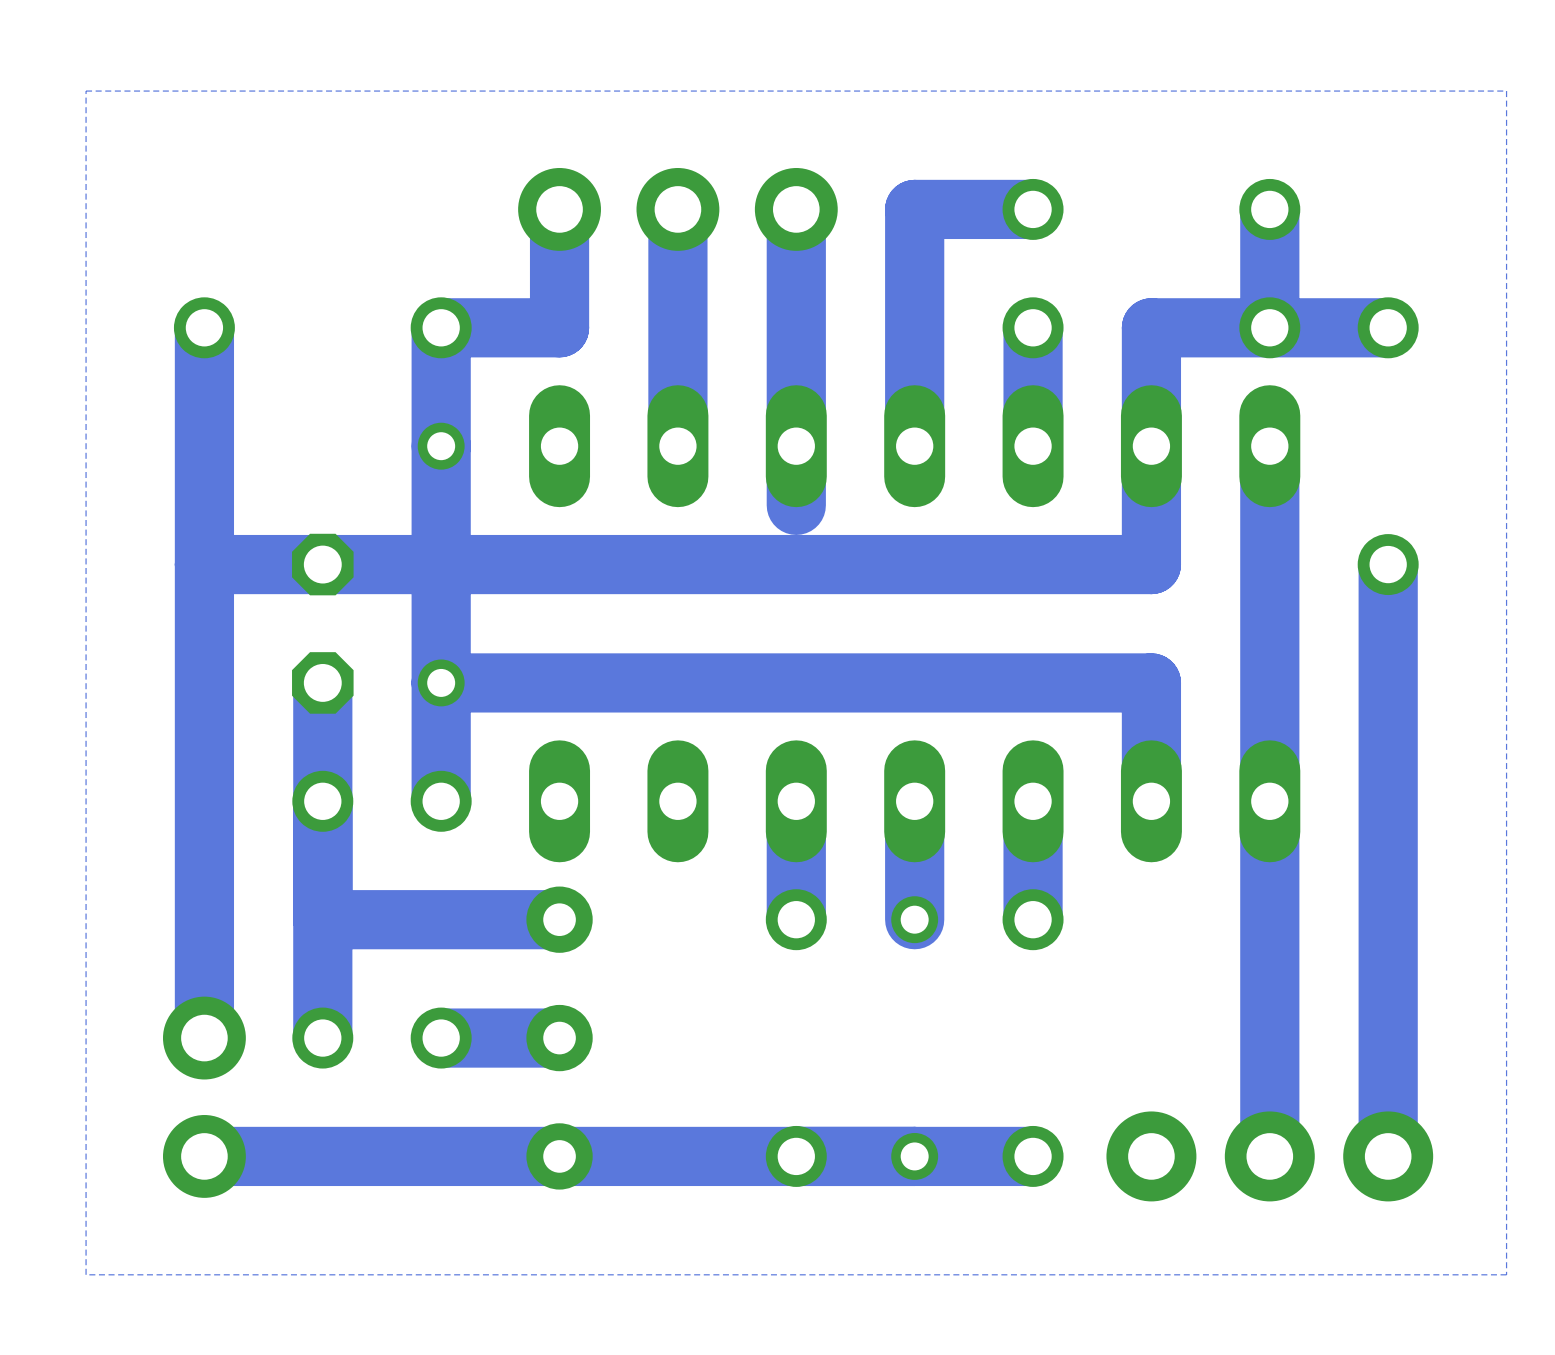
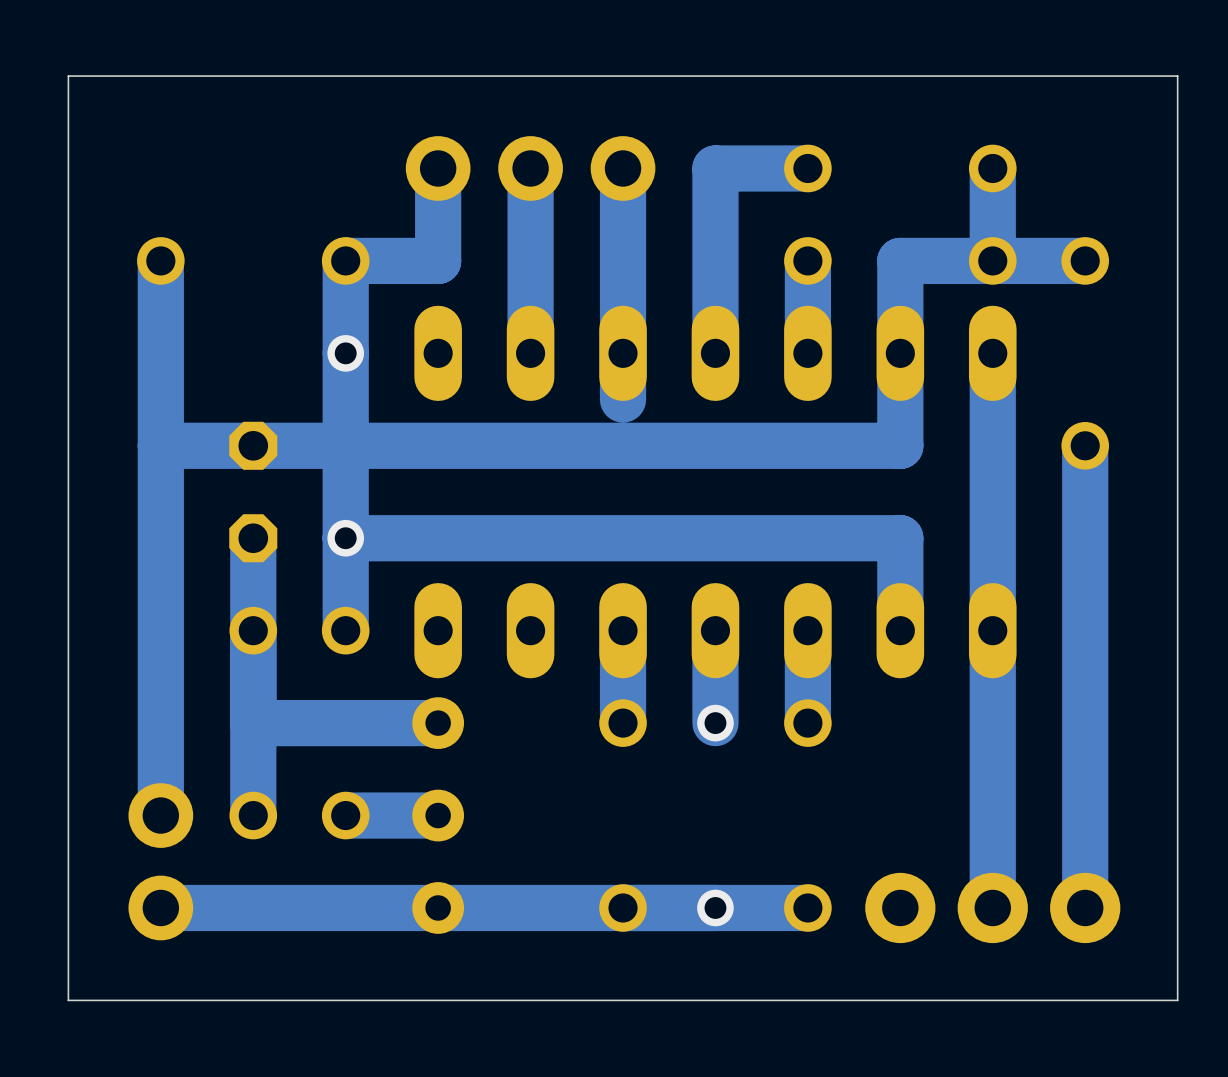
zone outline: (1506, 91) (1506, 1274) (86, 1274) (86, 91) (1506, 91) -> none
board edge: none -> (1177, 76) (1177, 1000) (68, 1000) (68, 76) (1177, 76)

